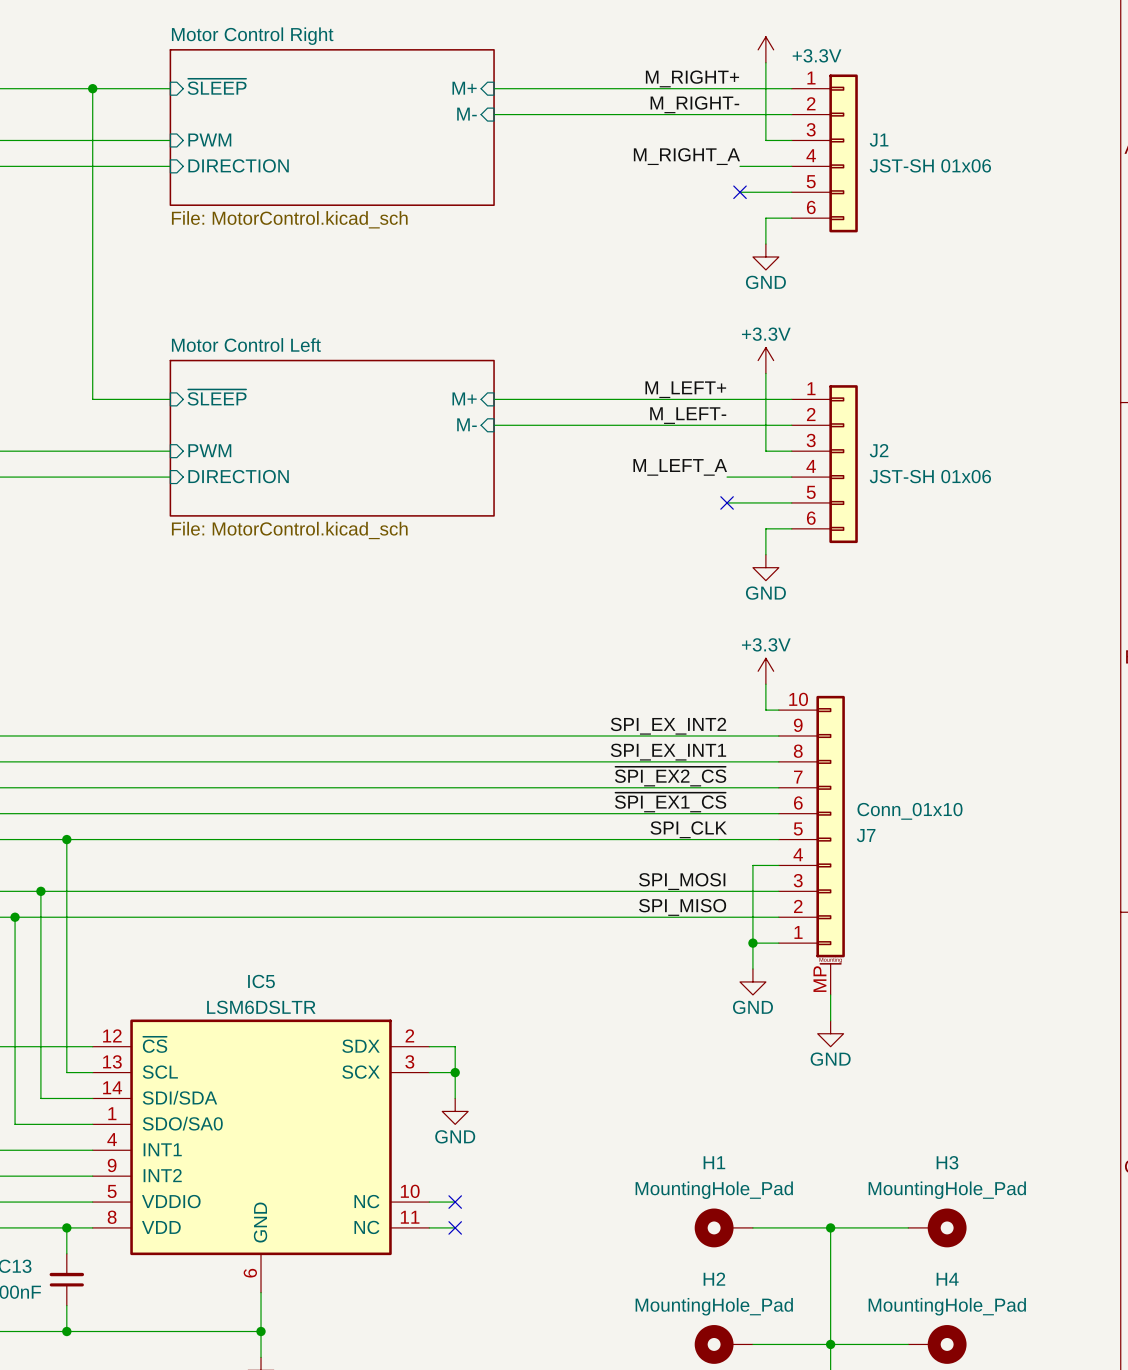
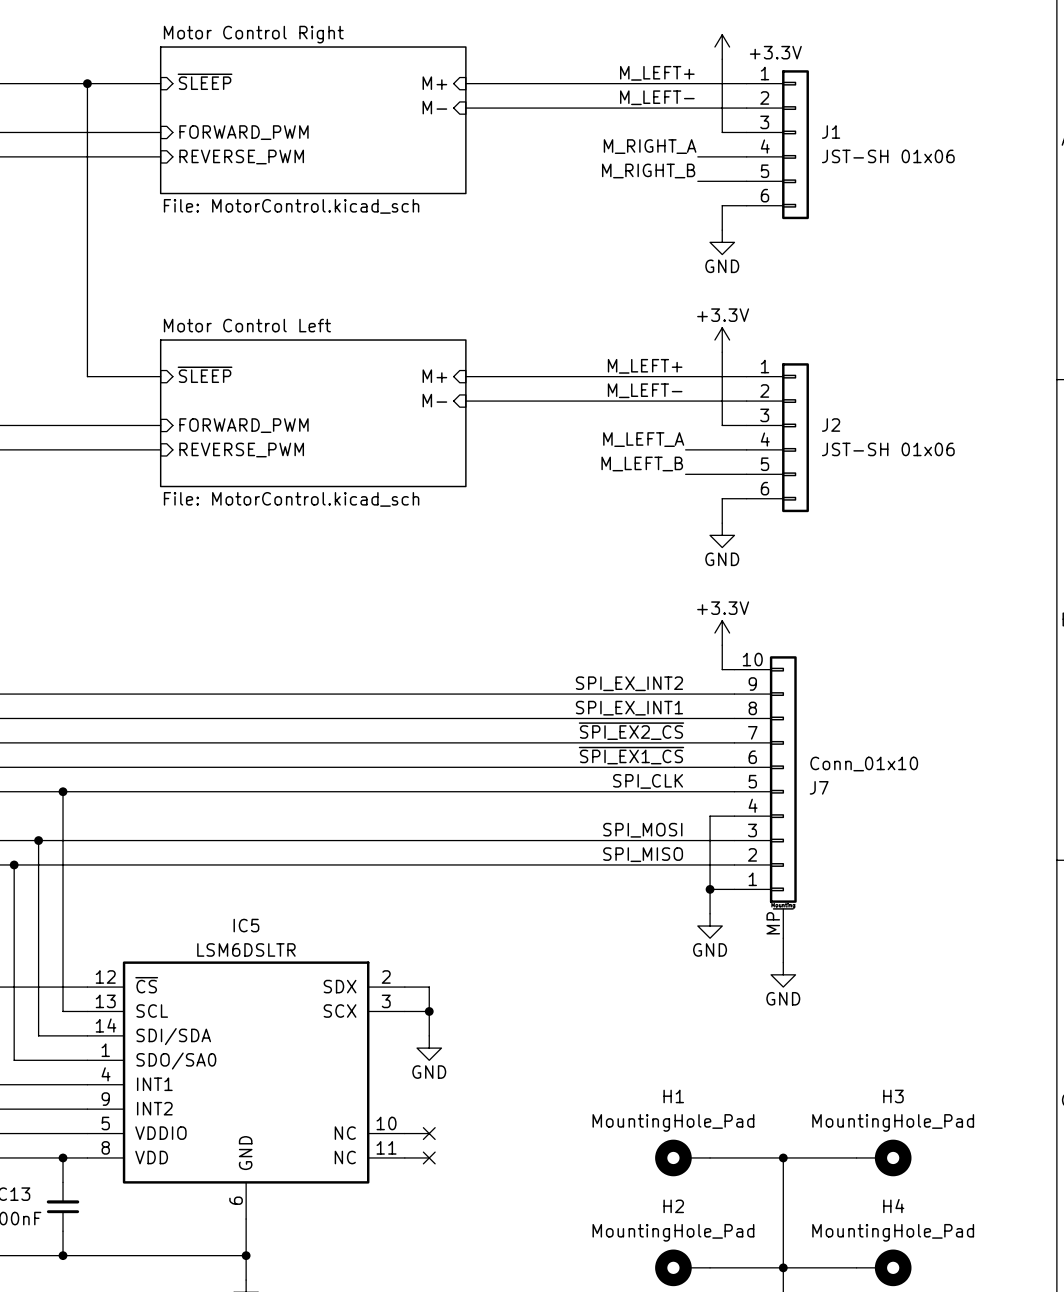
label: M_RIGHT+ (692, 78) -> M_LEFT+ (657, 73)
label: M_RIGHT- (694, 104) -> M_LEFT- (657, 97)
sheet pin: PWM (209, 139) -> FORWARD_PWM (244, 132)
sheet pin: DIRECTION (238, 165) -> REVERSE_PWM (241, 157)
label: none -> M_RIGHT_B (648, 170)
no-connect mark: (740, 192) -> none
sheet pin: PWM (209, 450) -> FORWARD_PWM (244, 425)
sheet pin: DIRECTION (238, 476) -> REVERSE_PWM (241, 450)
label: none -> M_LEFT_B (642, 463)
no-connect mark: (727, 502) -> none

